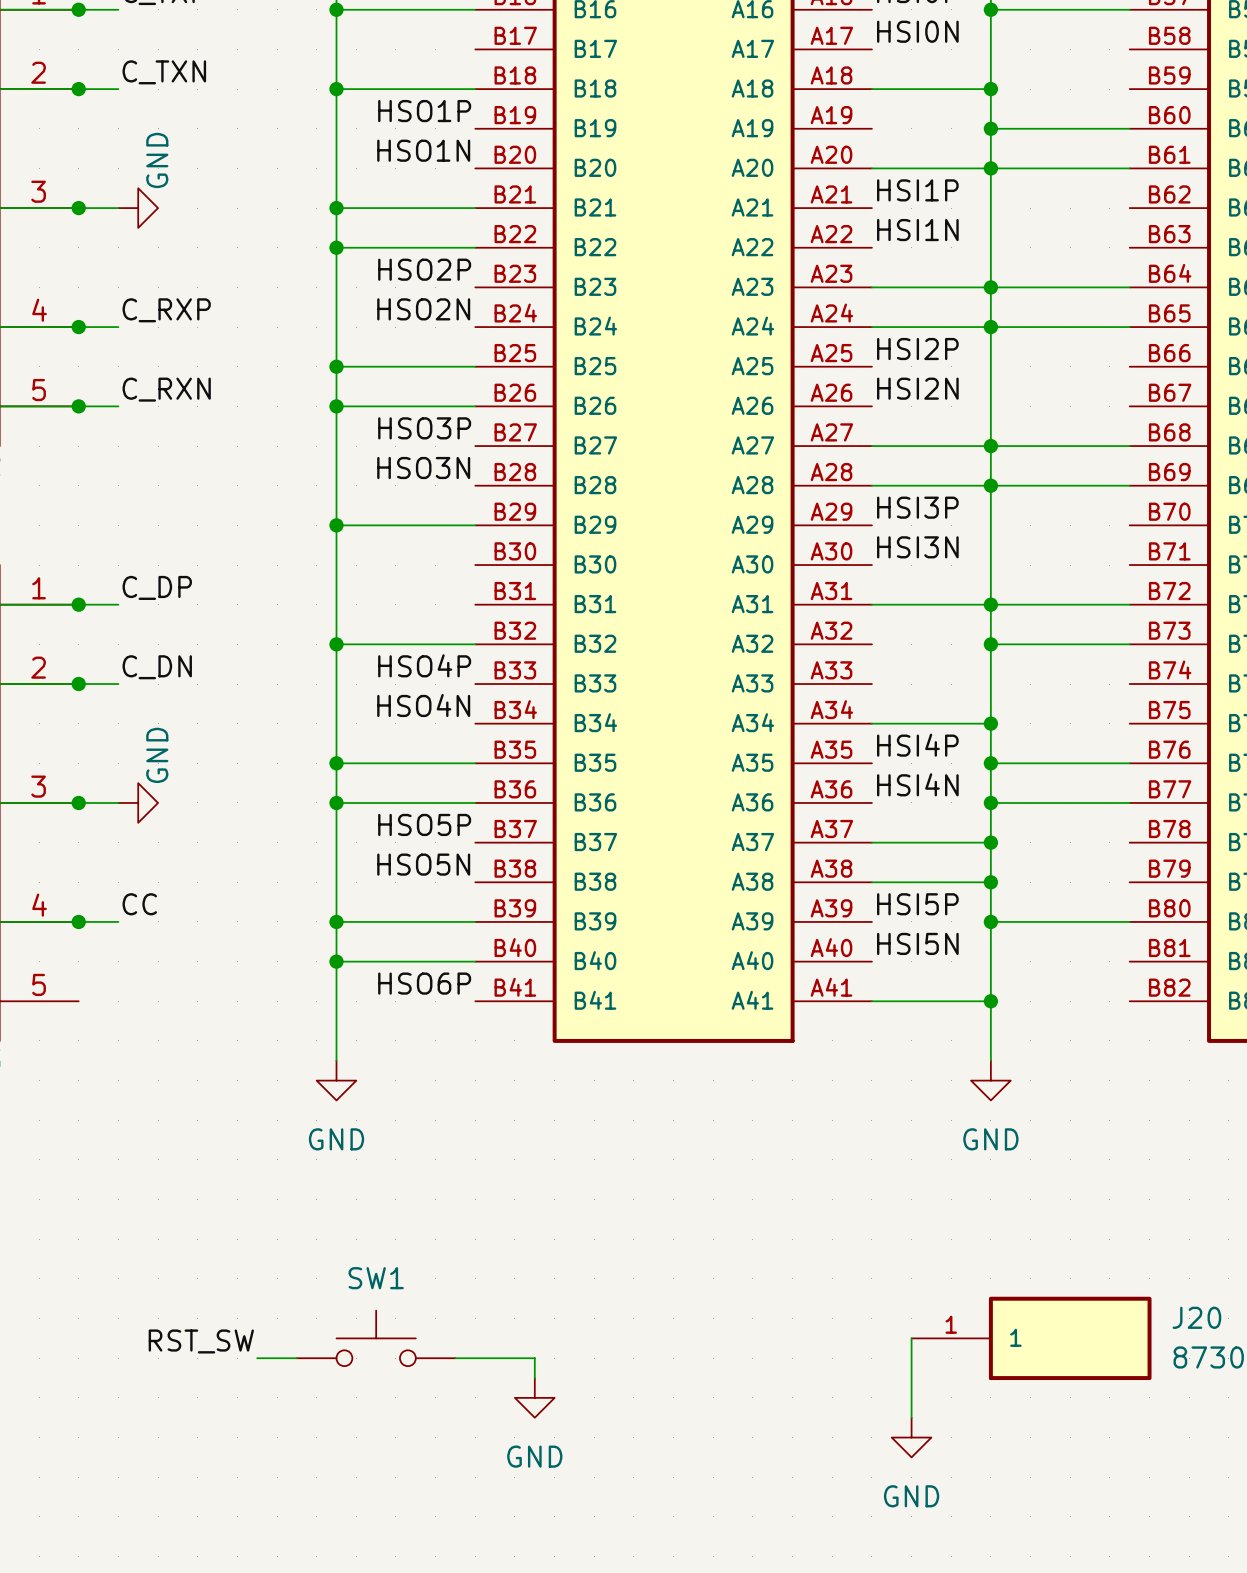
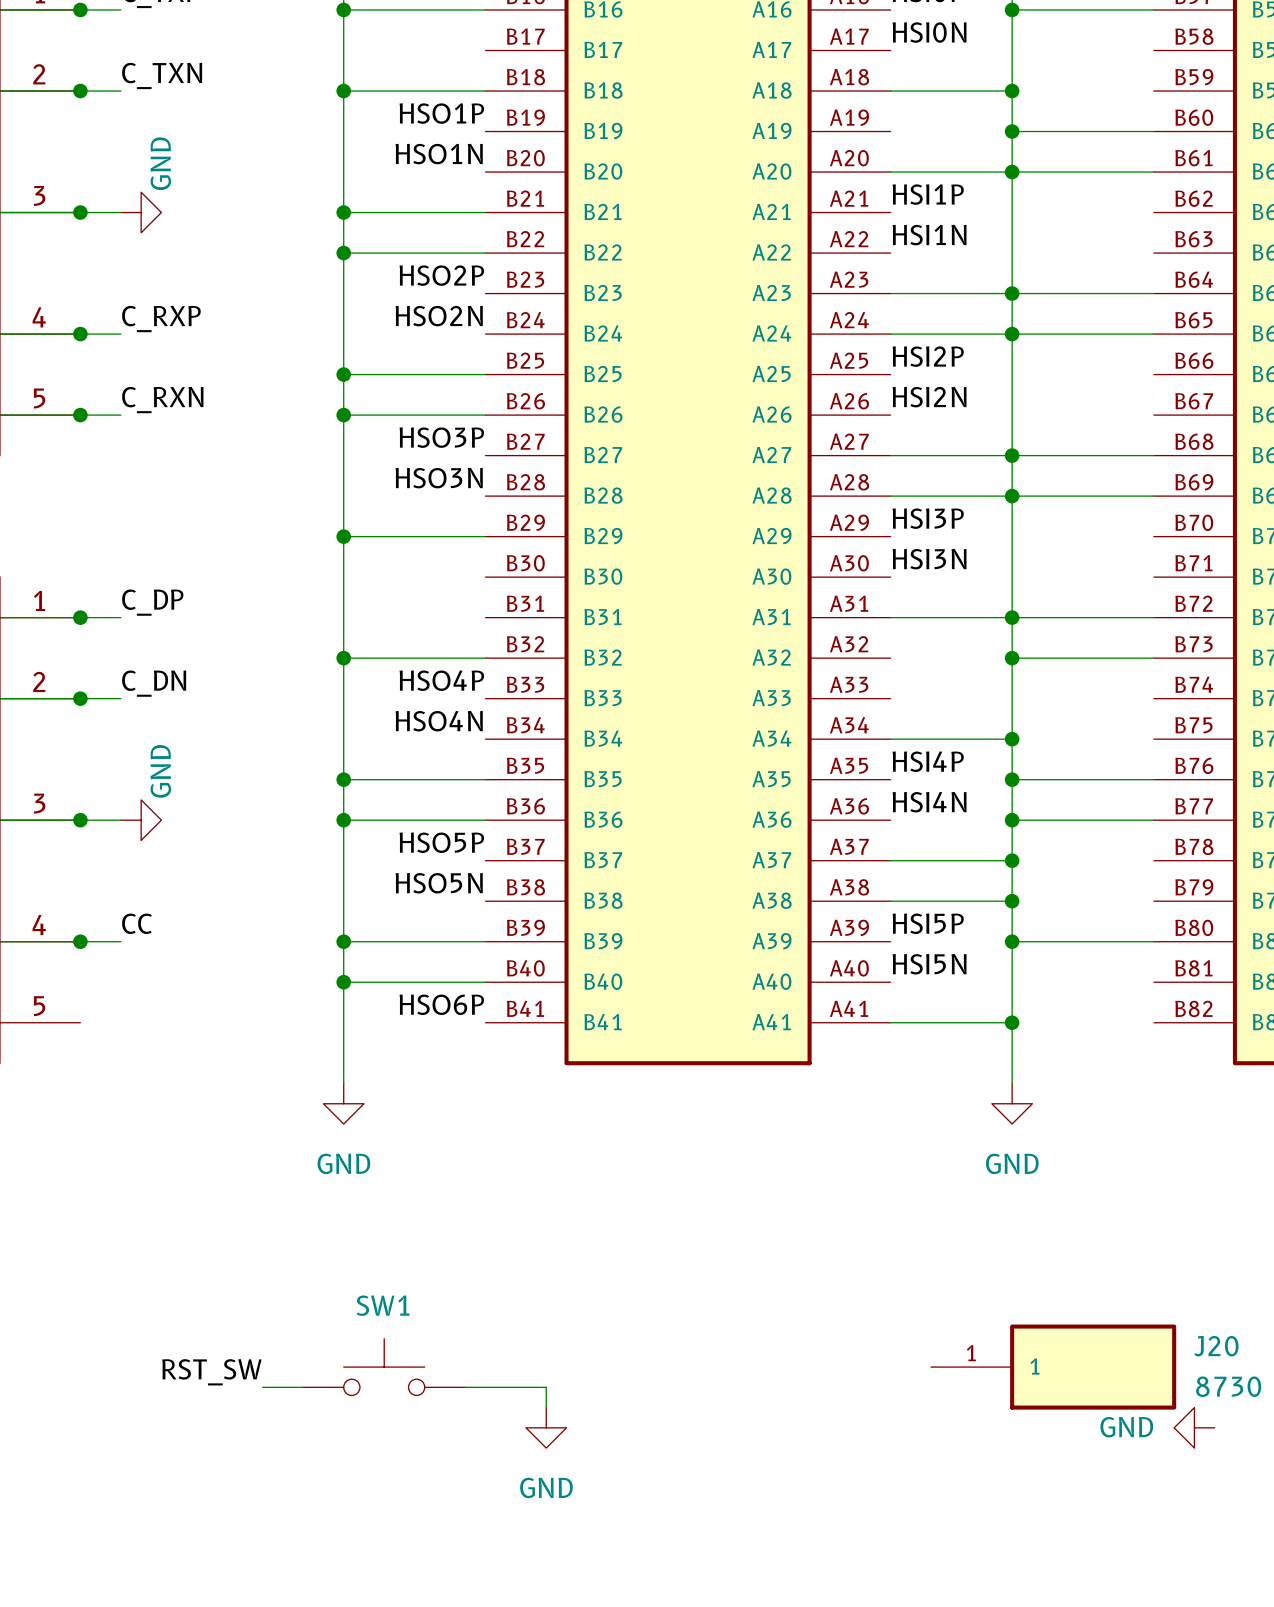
wire: (911, 1338) (911, 1417) -> none
power symbol: none -> GND (1194, 1427)
power symbol: GND (911, 1437) -> none

